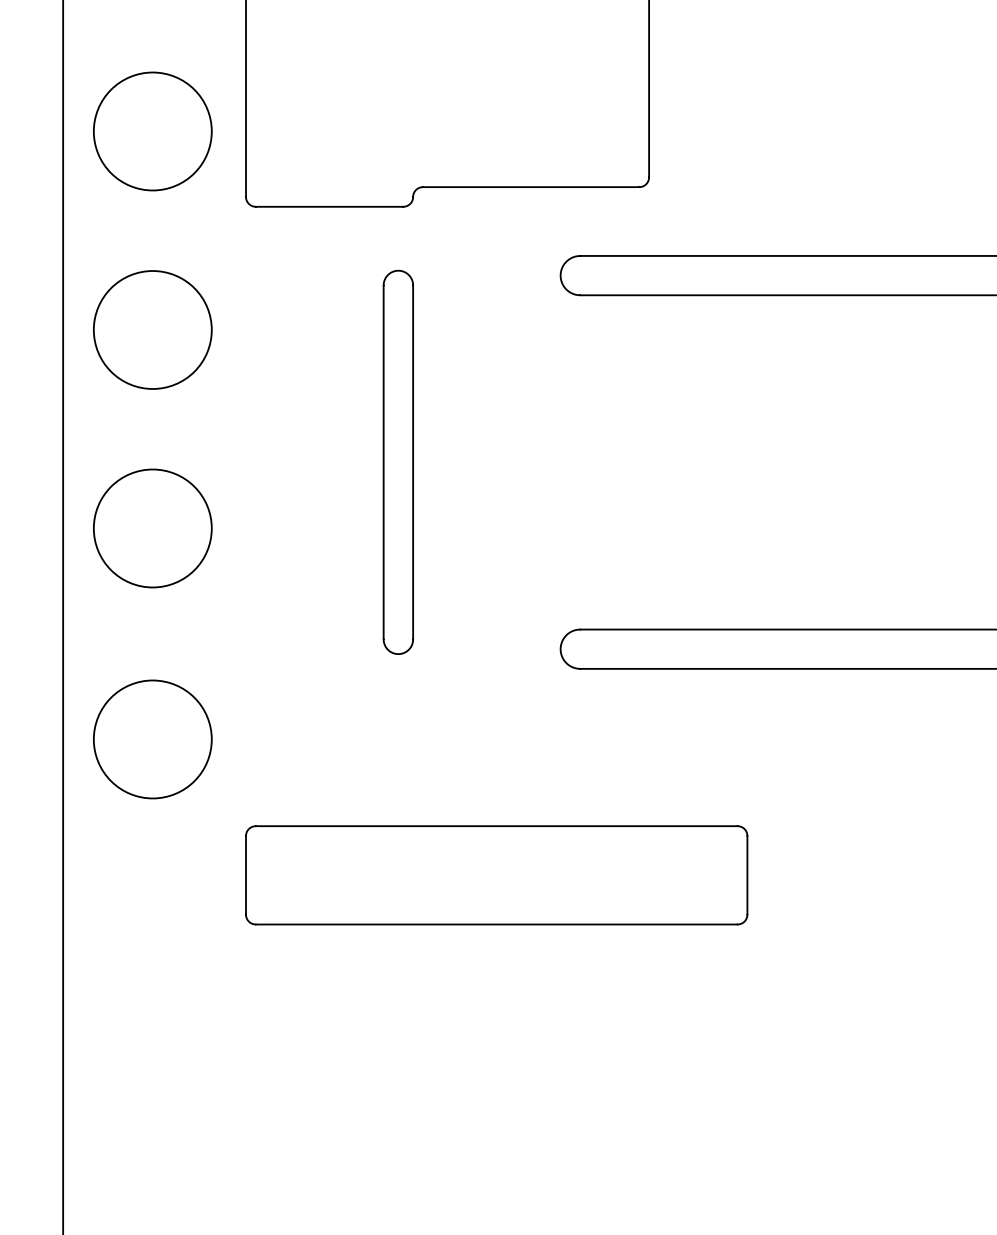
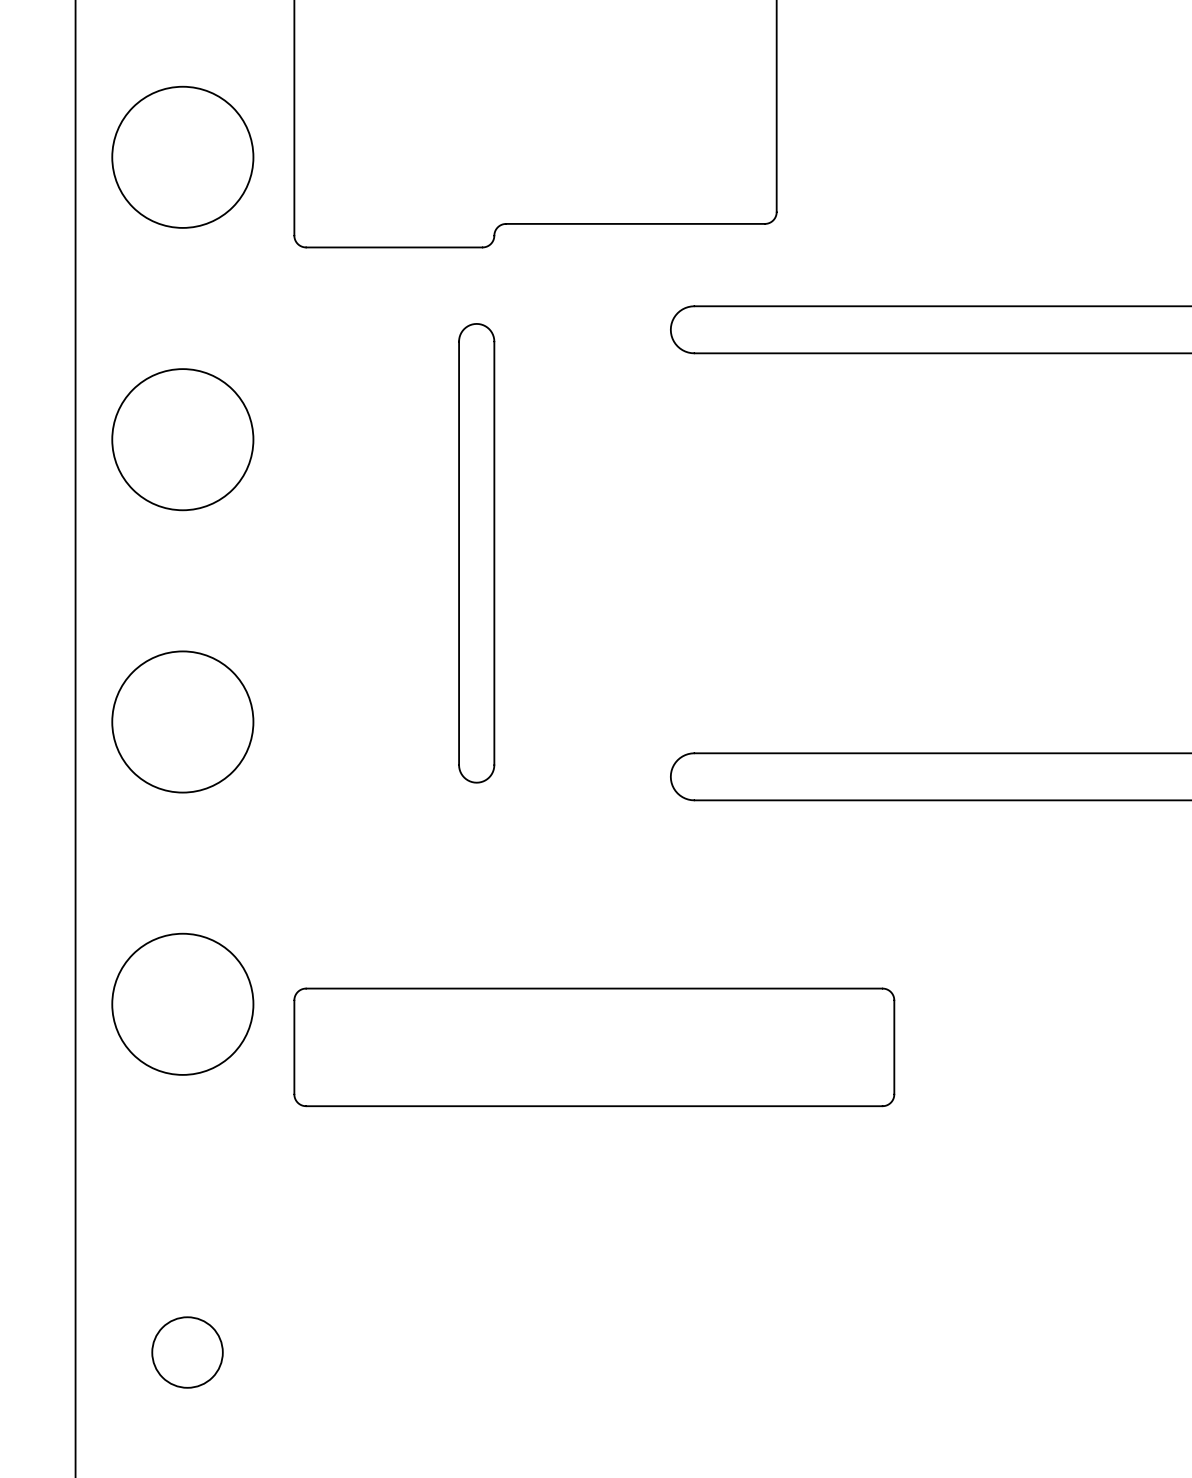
round board edge position: (152, 329) -> (182, 439)
round board edge: [93, 469, 213, 588] -> none
round board edge: none -> [111, 650, 255, 794]
round board edge: [93, 679, 213, 799] -> none
round board edge: none -> [111, 933, 255, 1076]
round board edge: none -> [151, 1316, 224, 1389]

